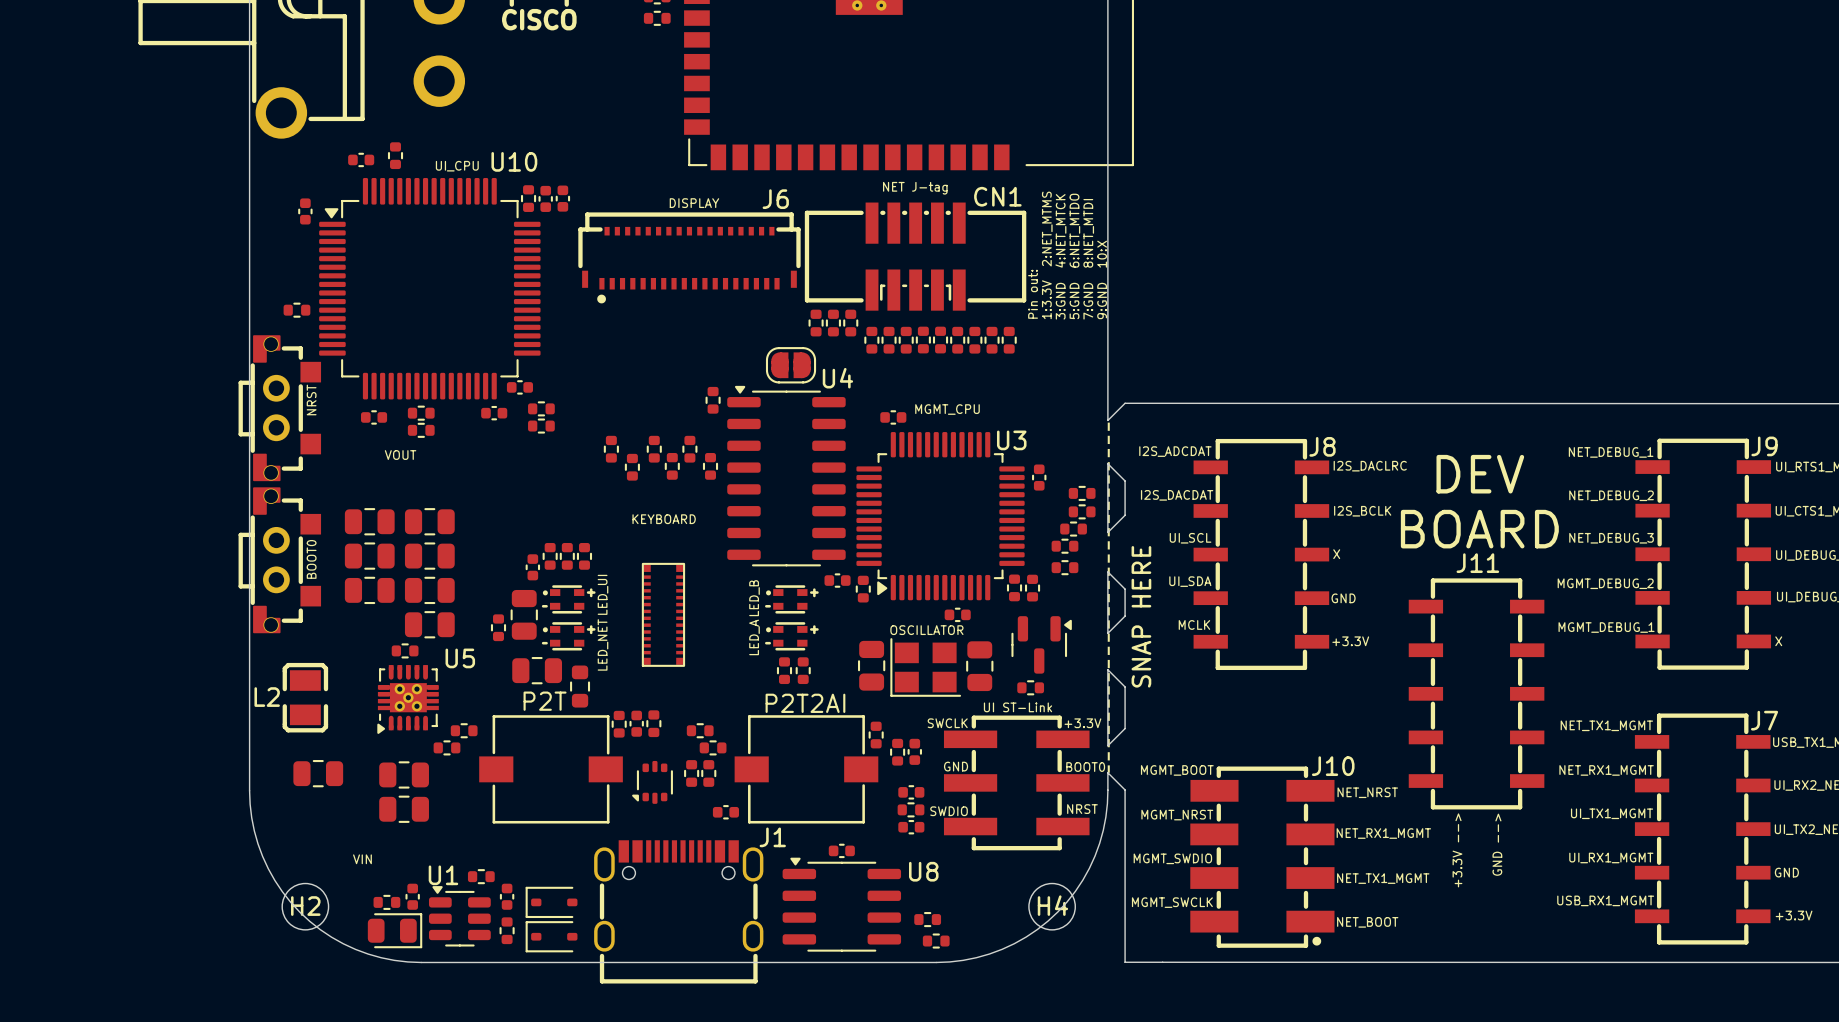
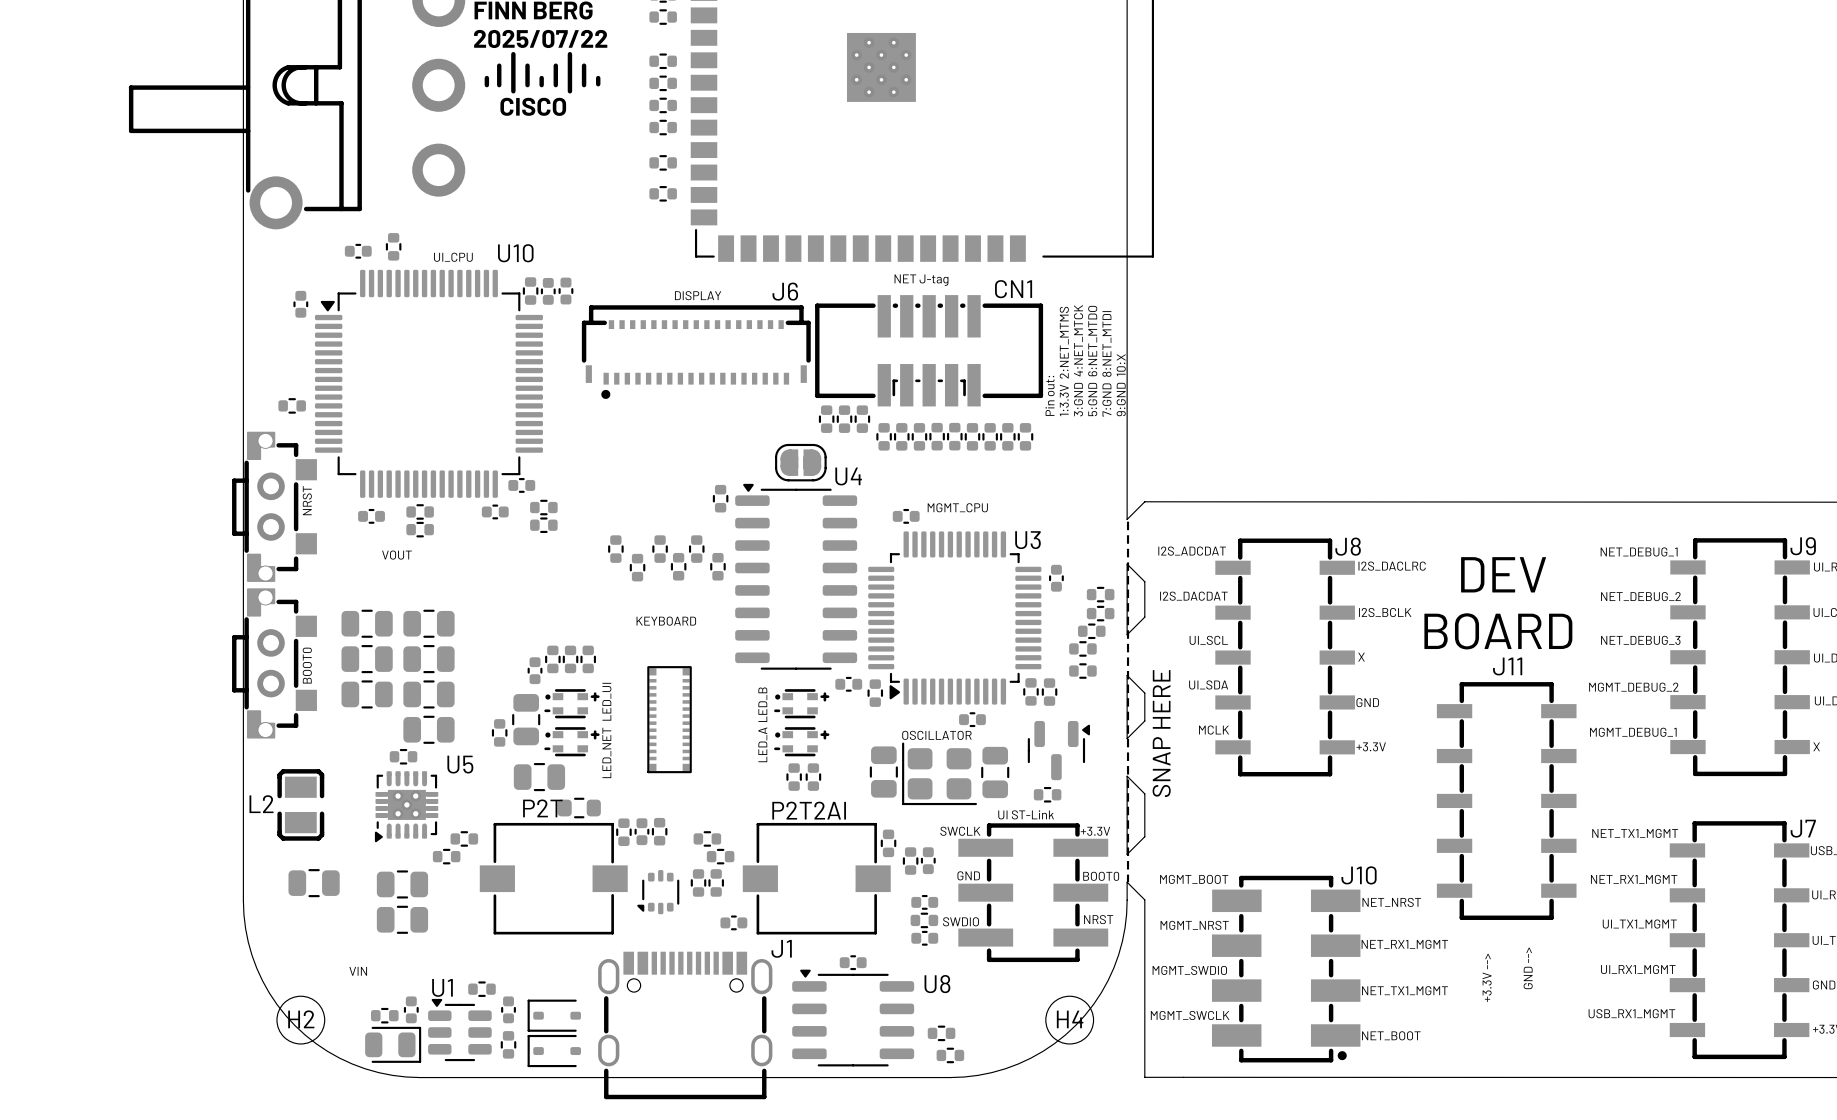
part: none -> (663, 127)
part: none -> (663, 162)
part: none -> (663, 193)
part footprint: [890, 638, 962, 697] -> [902, 742, 978, 806]
part rotation: 0° (580, 686) -> 90° clockwise (579, 808)

